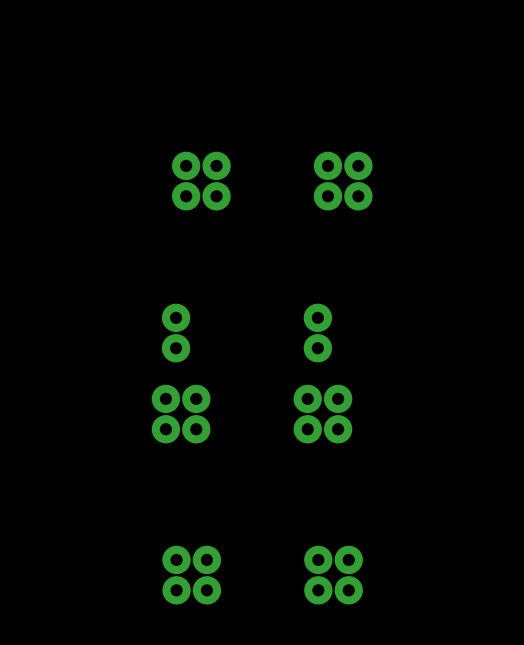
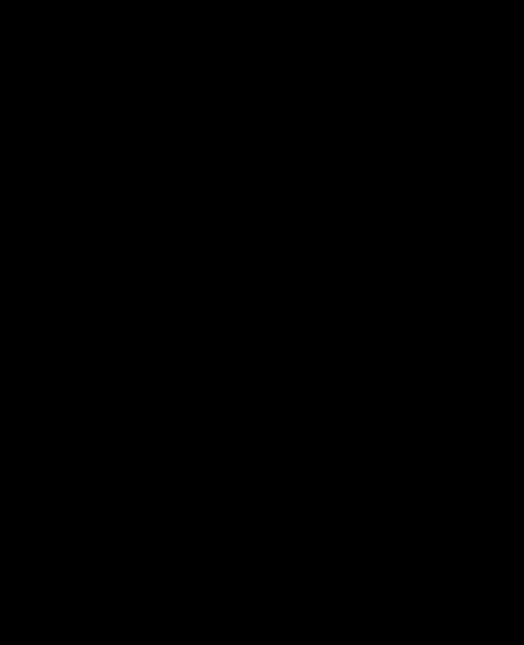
via: (186, 165) -> none
via: (216, 165) -> none
via: (327, 165) -> none
via: (358, 165) -> none
via: (186, 196) -> none
via: (216, 196) -> none
via: (327, 196) -> none
via: (358, 196) -> none
via: (176, 317) -> none
via: (317, 317) -> none
via: (176, 348) -> none
via: (317, 348) -> none
via: (165, 398) -> none
via: (196, 398) -> none
via: (307, 398) -> none
via: (338, 398) -> none
via: (165, 429) -> none
via: (196, 429) -> none
via: (307, 429) -> none
via: (338, 429) -> none
via: (176, 559) -> none
via: (206, 559) -> none
via: (318, 559) -> none
via: (348, 559) -> none
via: (176, 590) -> none
via: (206, 590) -> none
via: (318, 590) -> none
via: (348, 590) -> none

